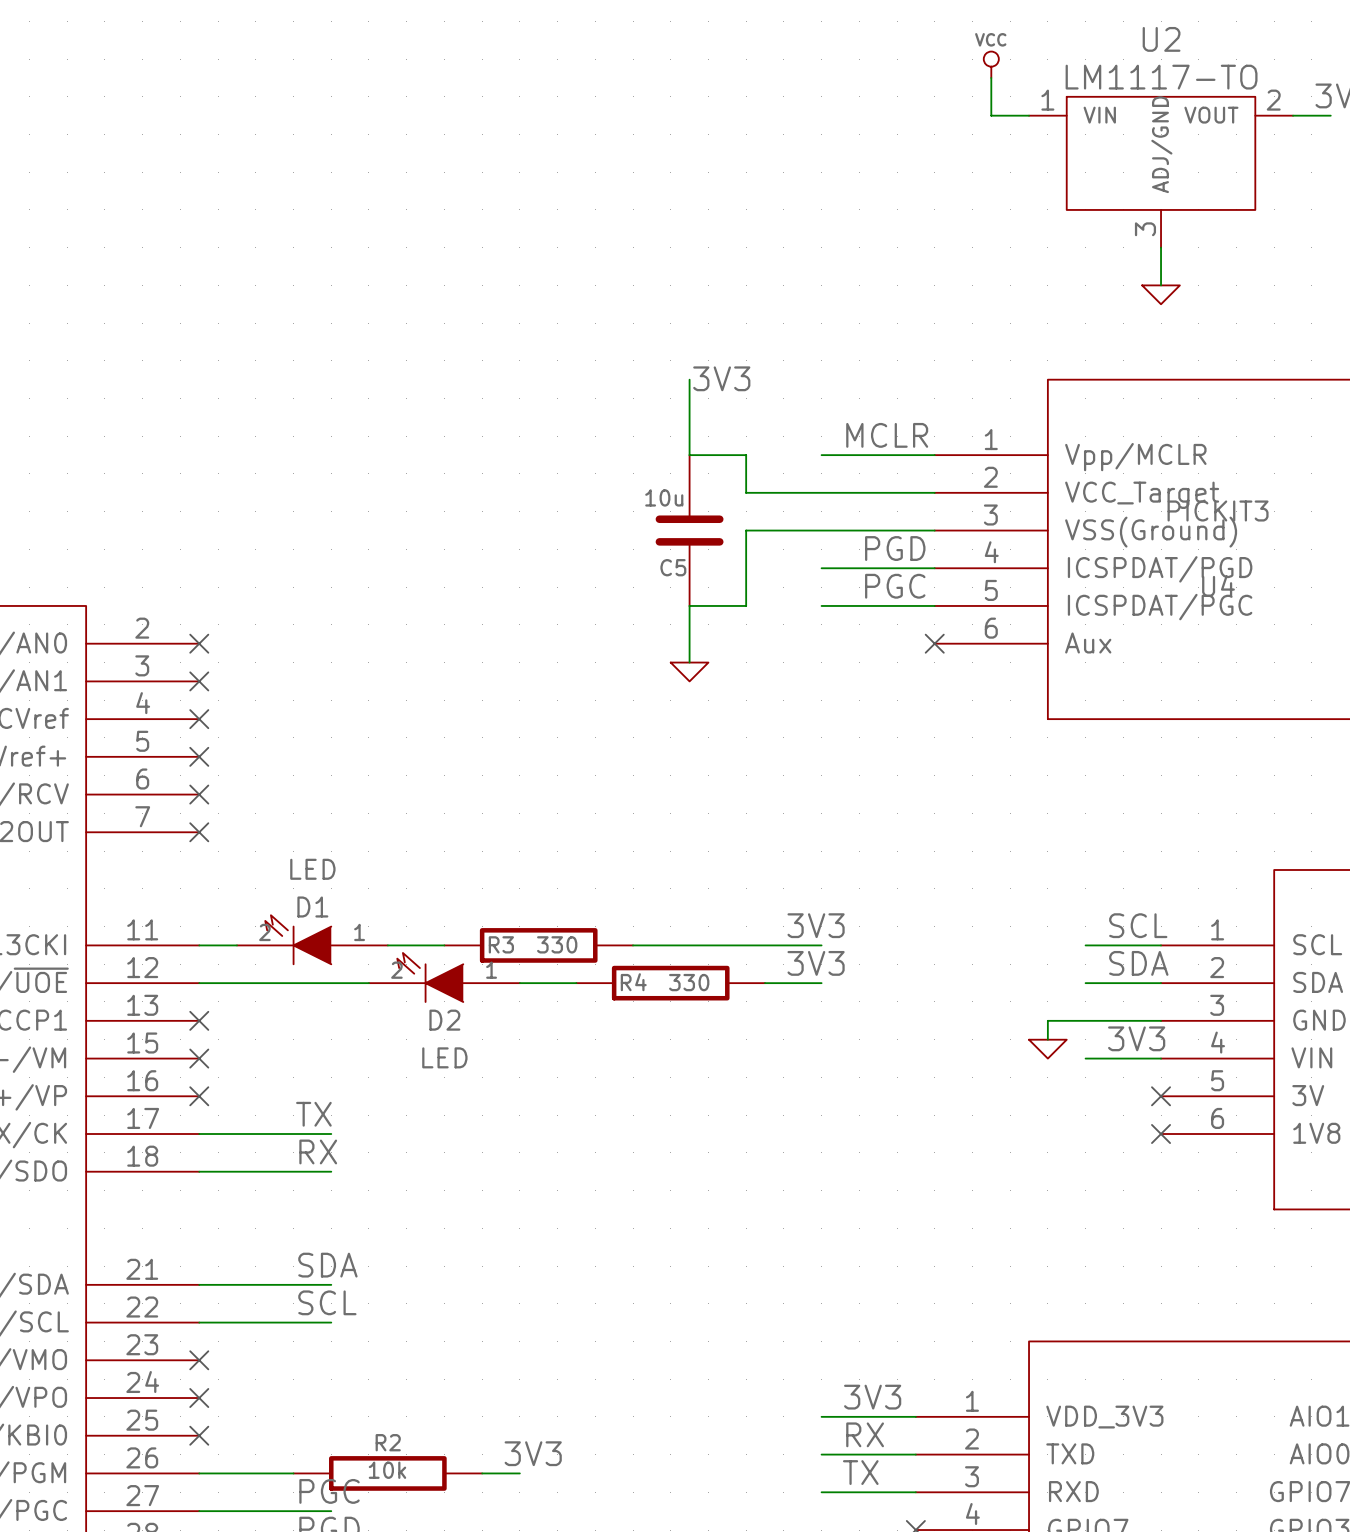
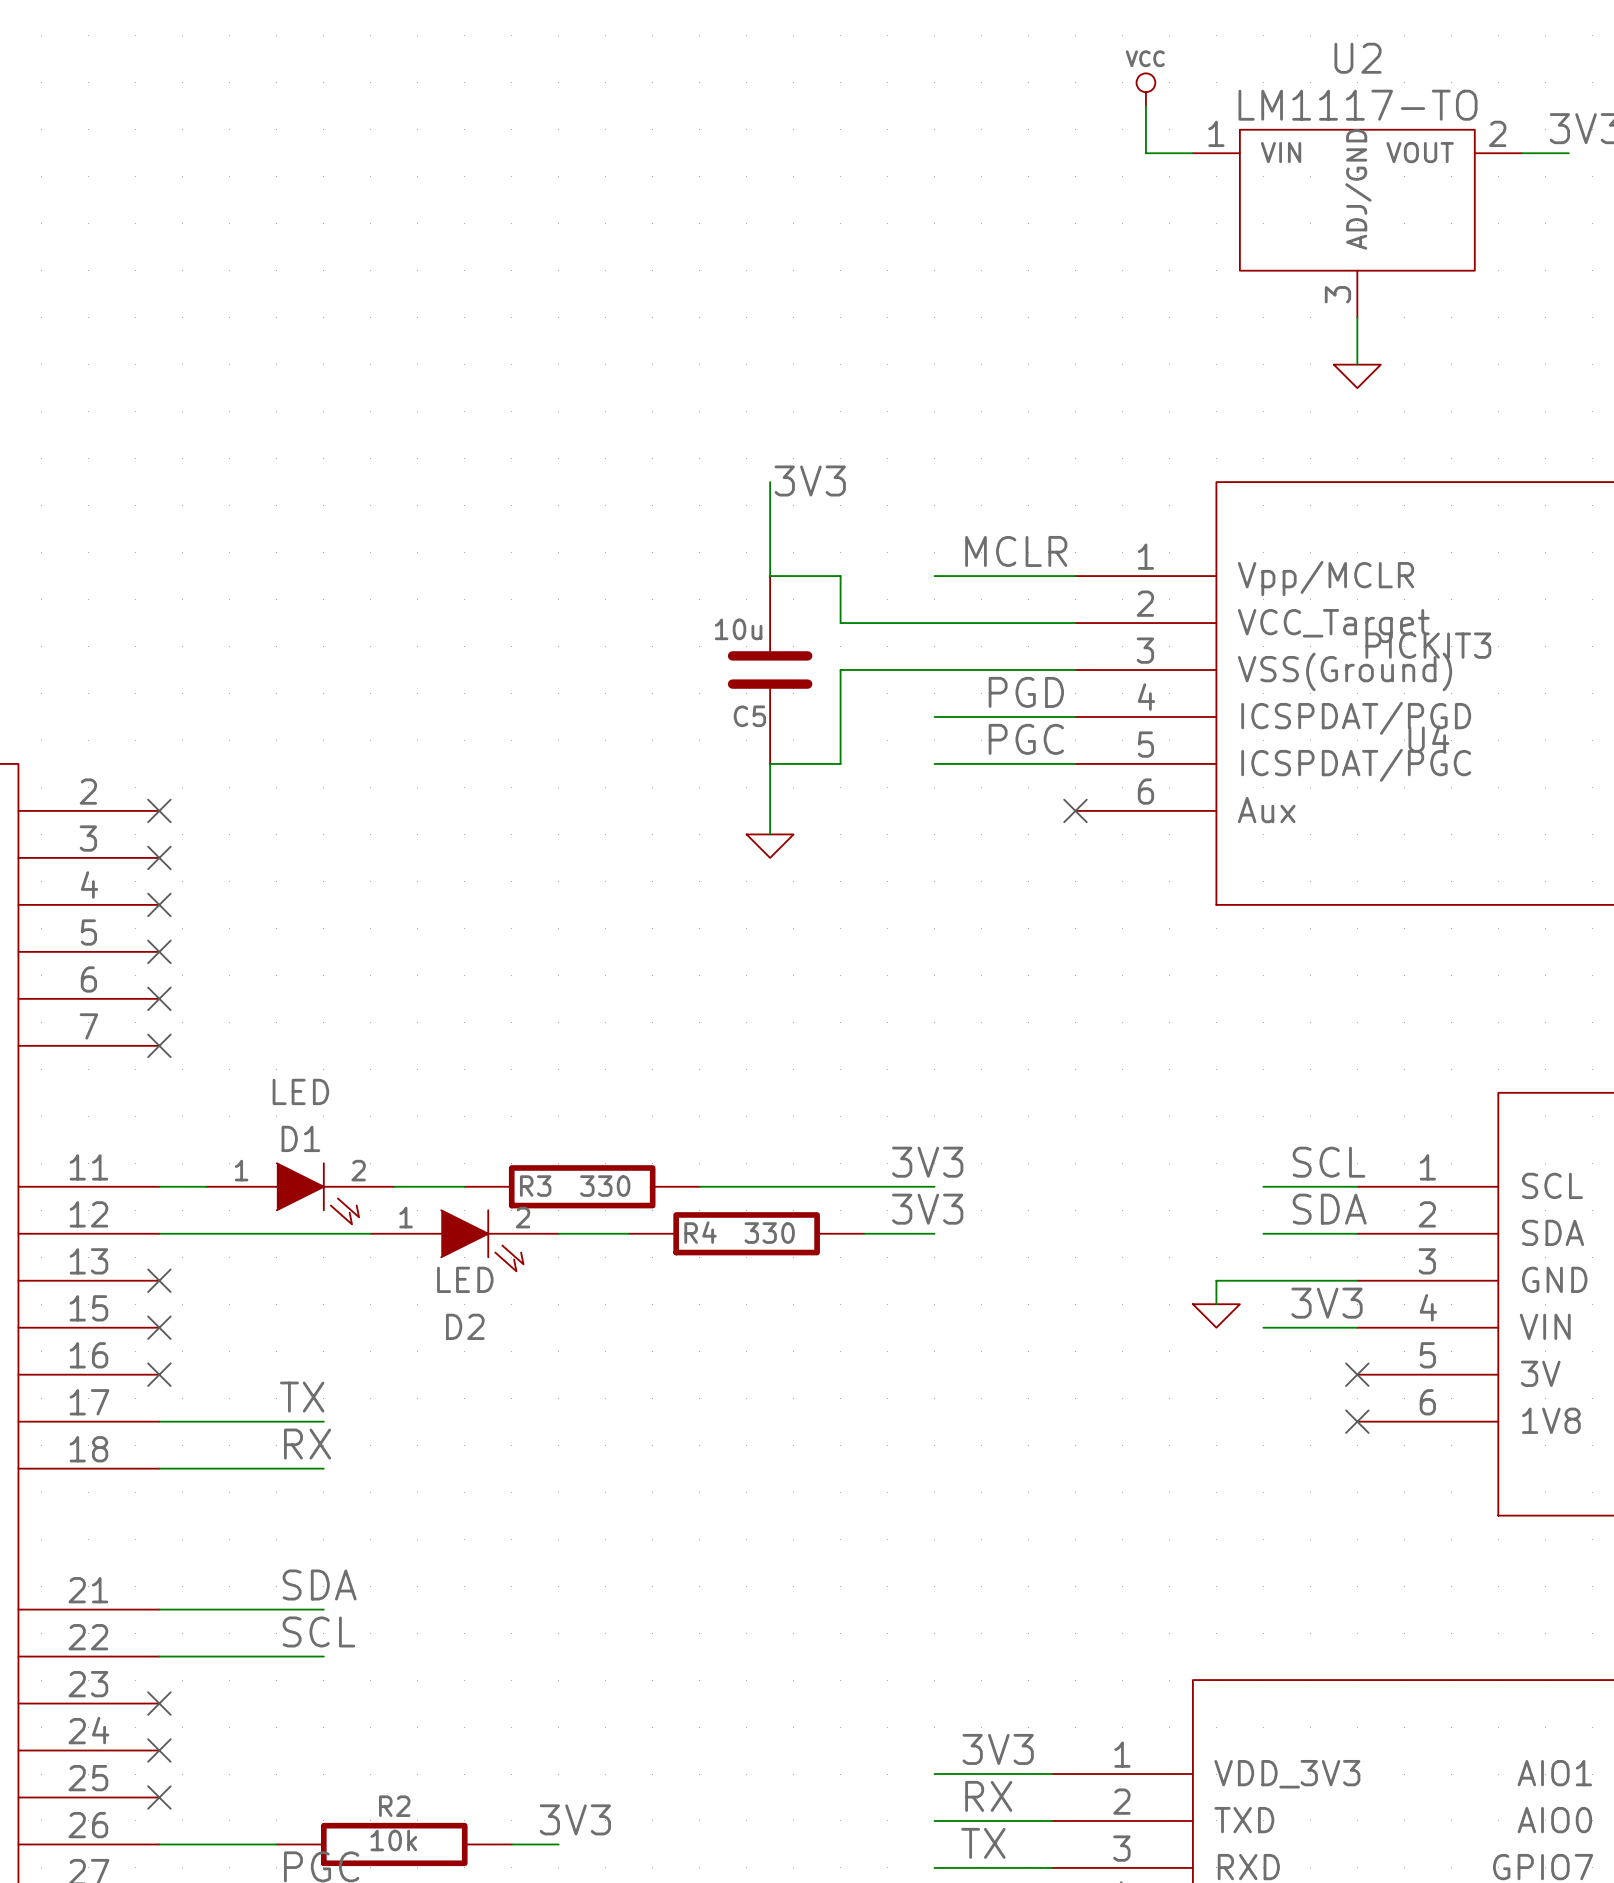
D1 rotation: 0° (298, 939) -> 180° (317, 1193)
D2 rotation: 0° (430, 977) -> 180° (482, 1240)
D2 value position: LED (444, 1057) -> LED (465, 1279)

